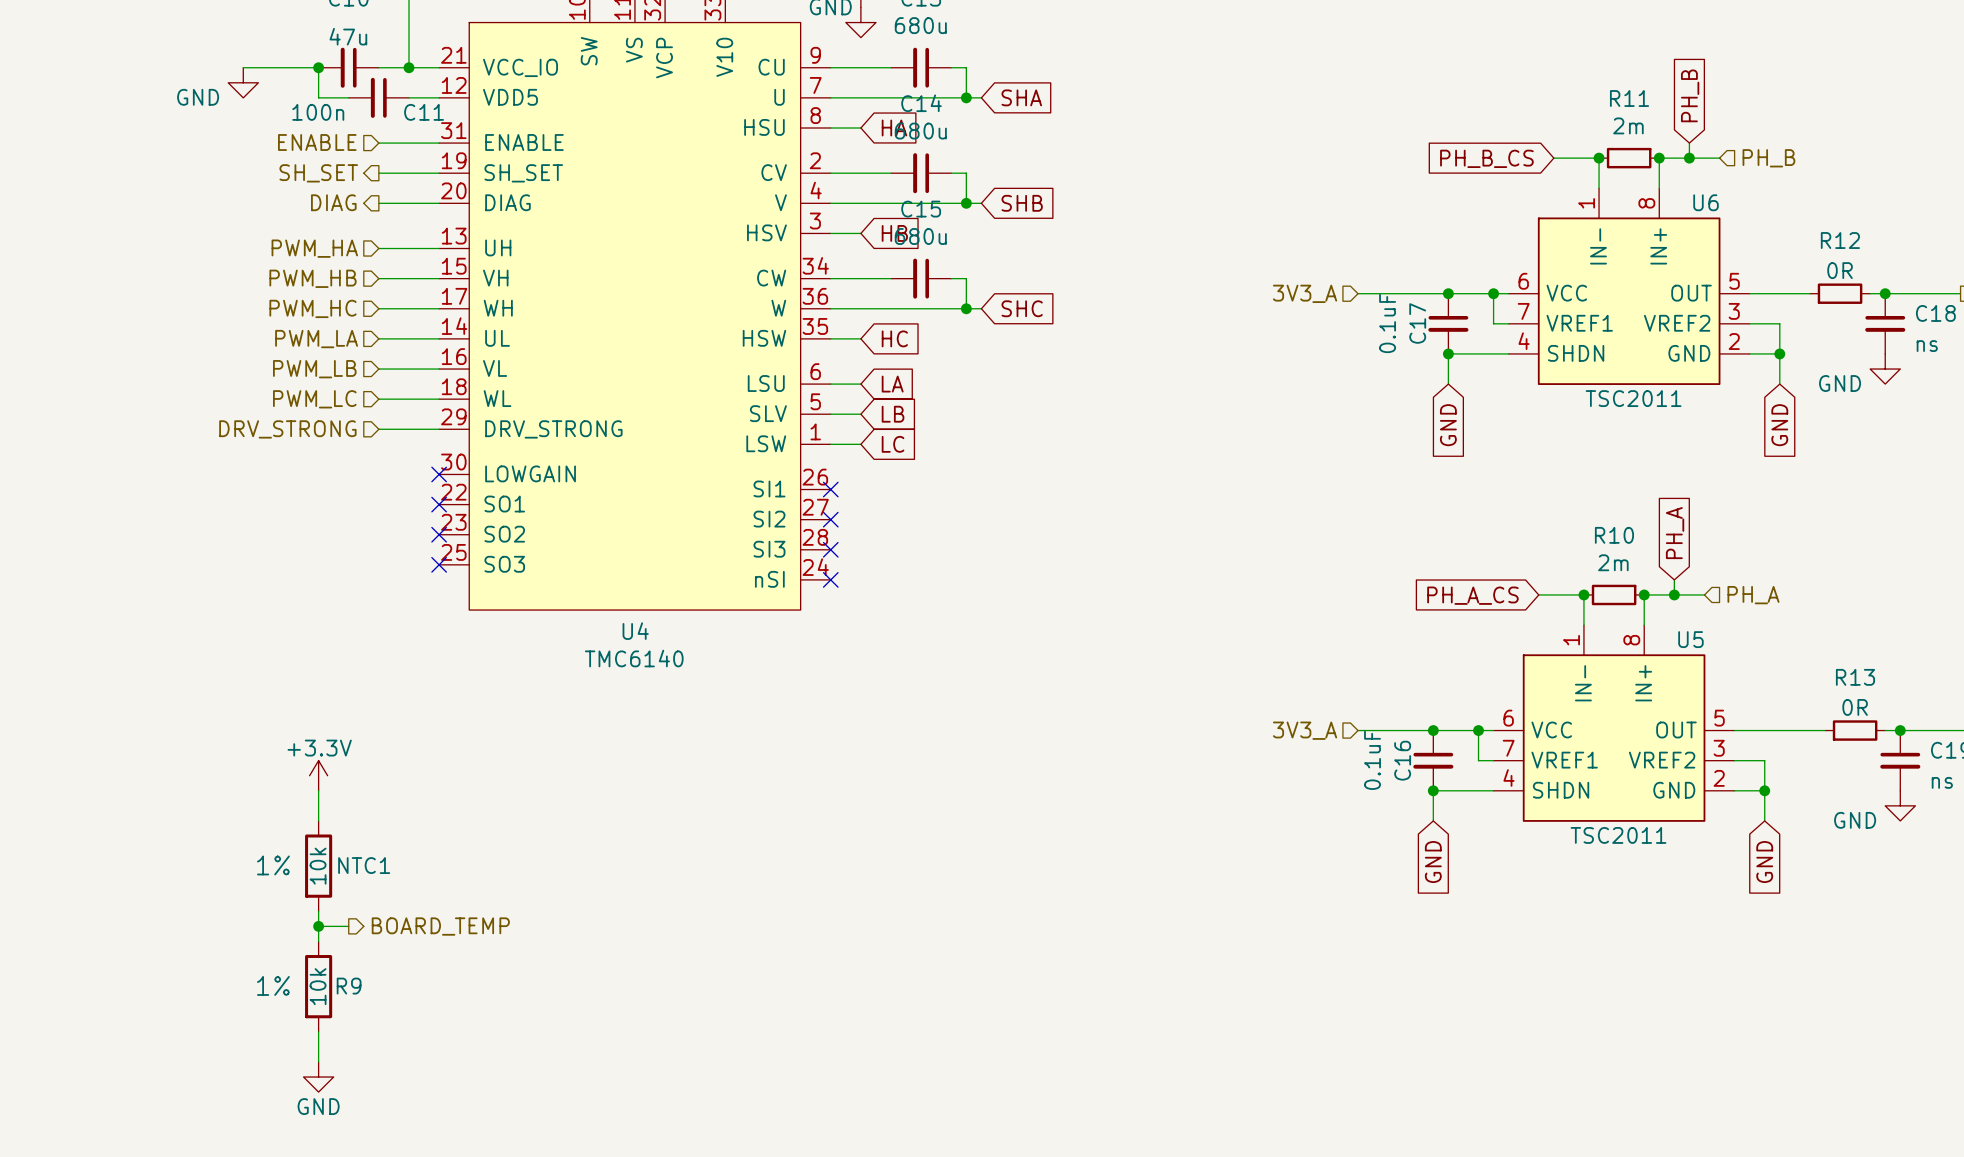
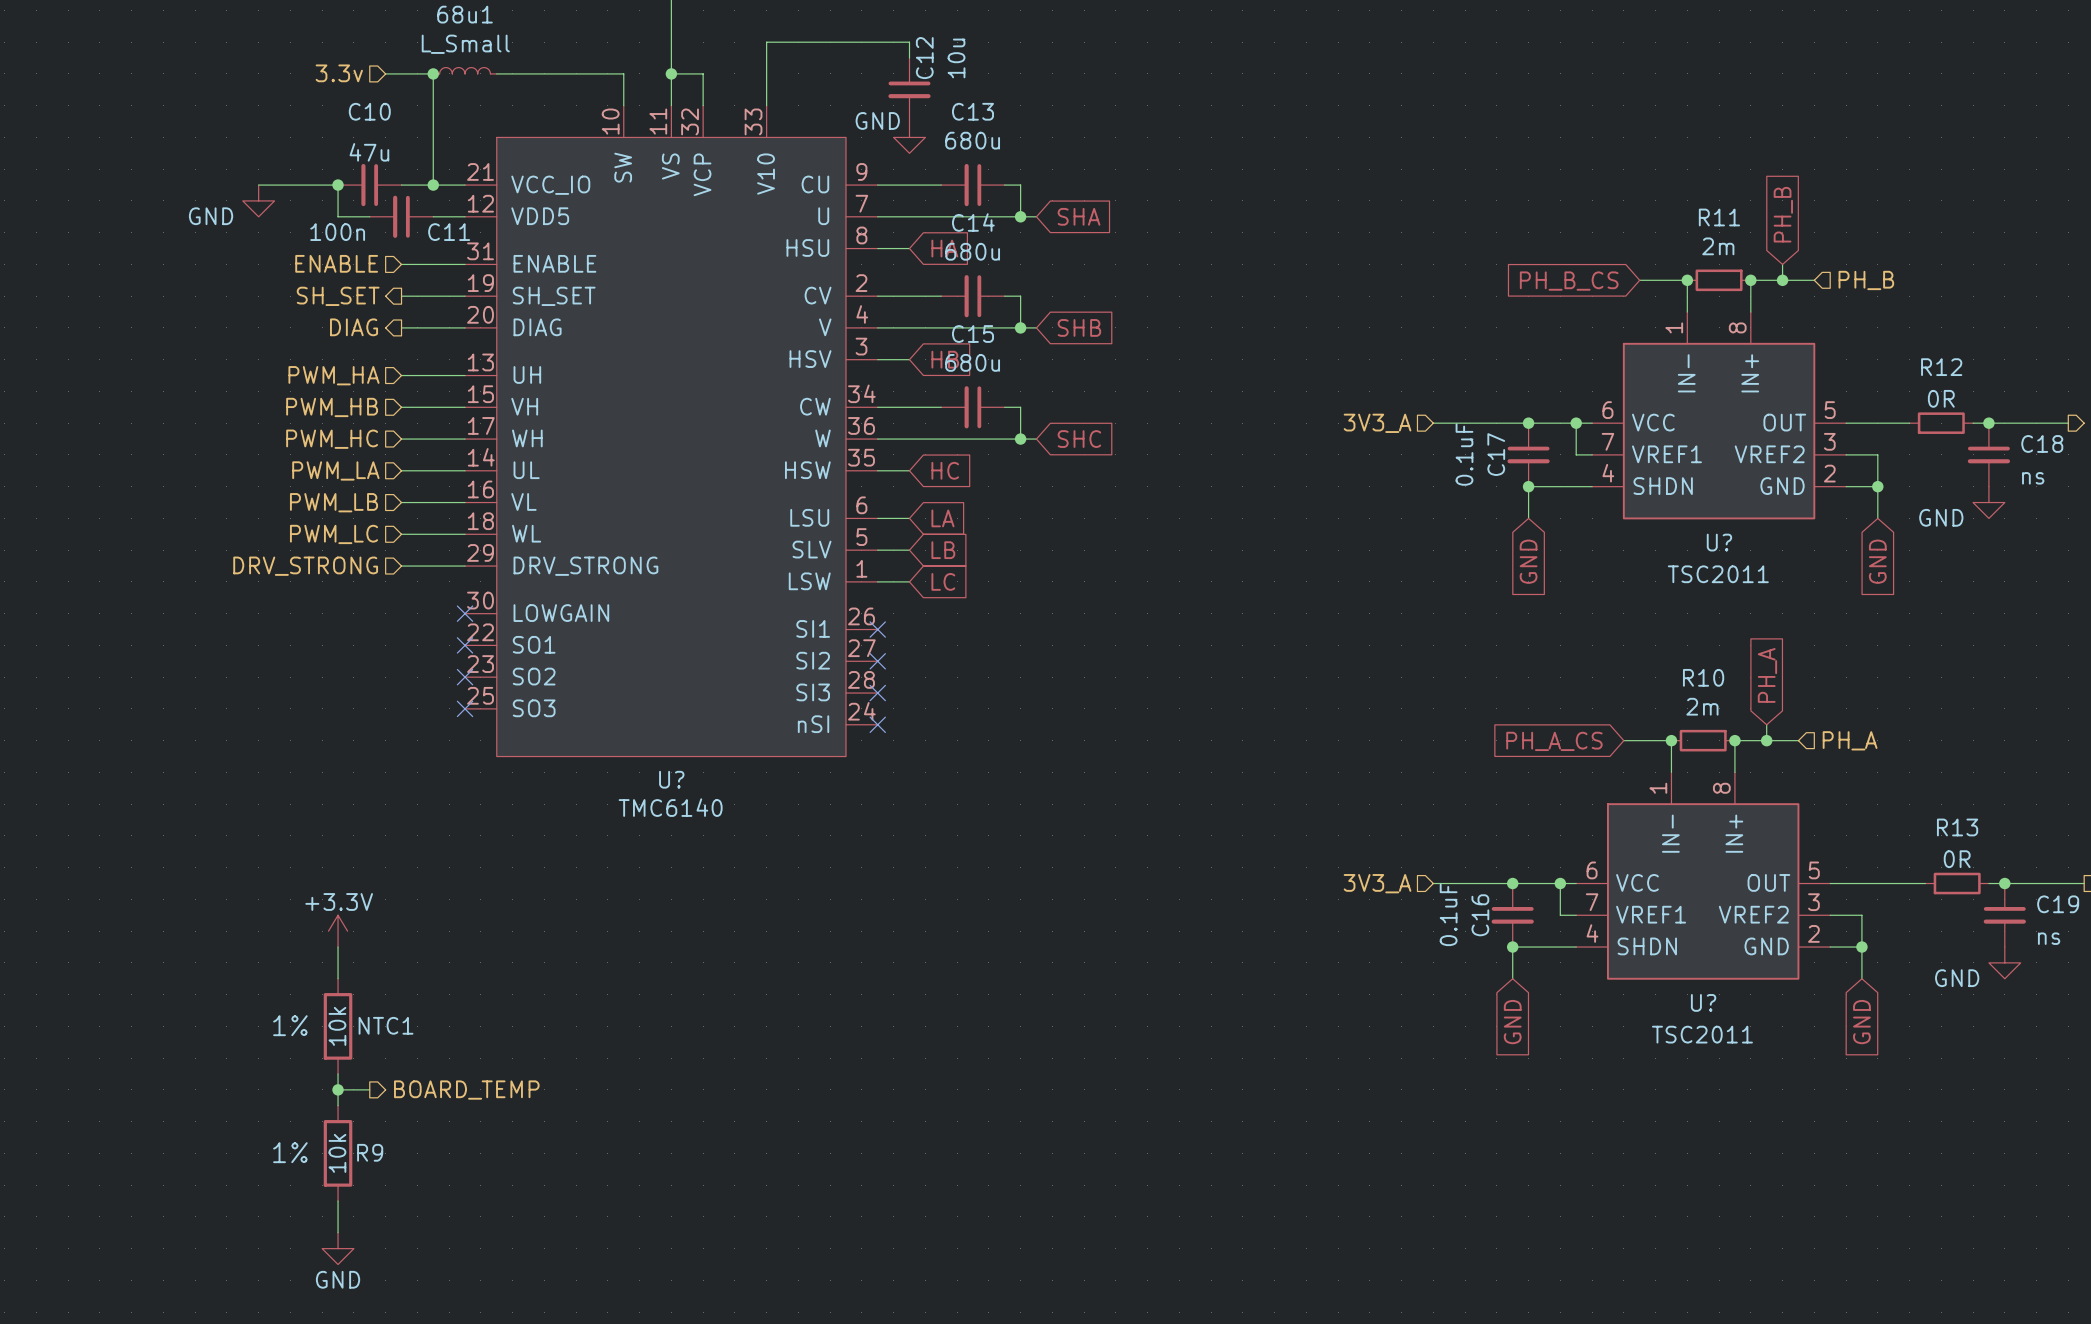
U6 name: U6 (1706, 202) -> U? (1719, 542)
U6 value position: TSC2011 (1633, 398) -> TSC2011 (1718, 574)
U4 name: U4 (635, 631) -> U? (671, 779)
U5 name: U5 (1690, 639) -> U? (1703, 1002)
U5 value position: TSC2011 (1618, 835) -> TSC2011 (1702, 1034)

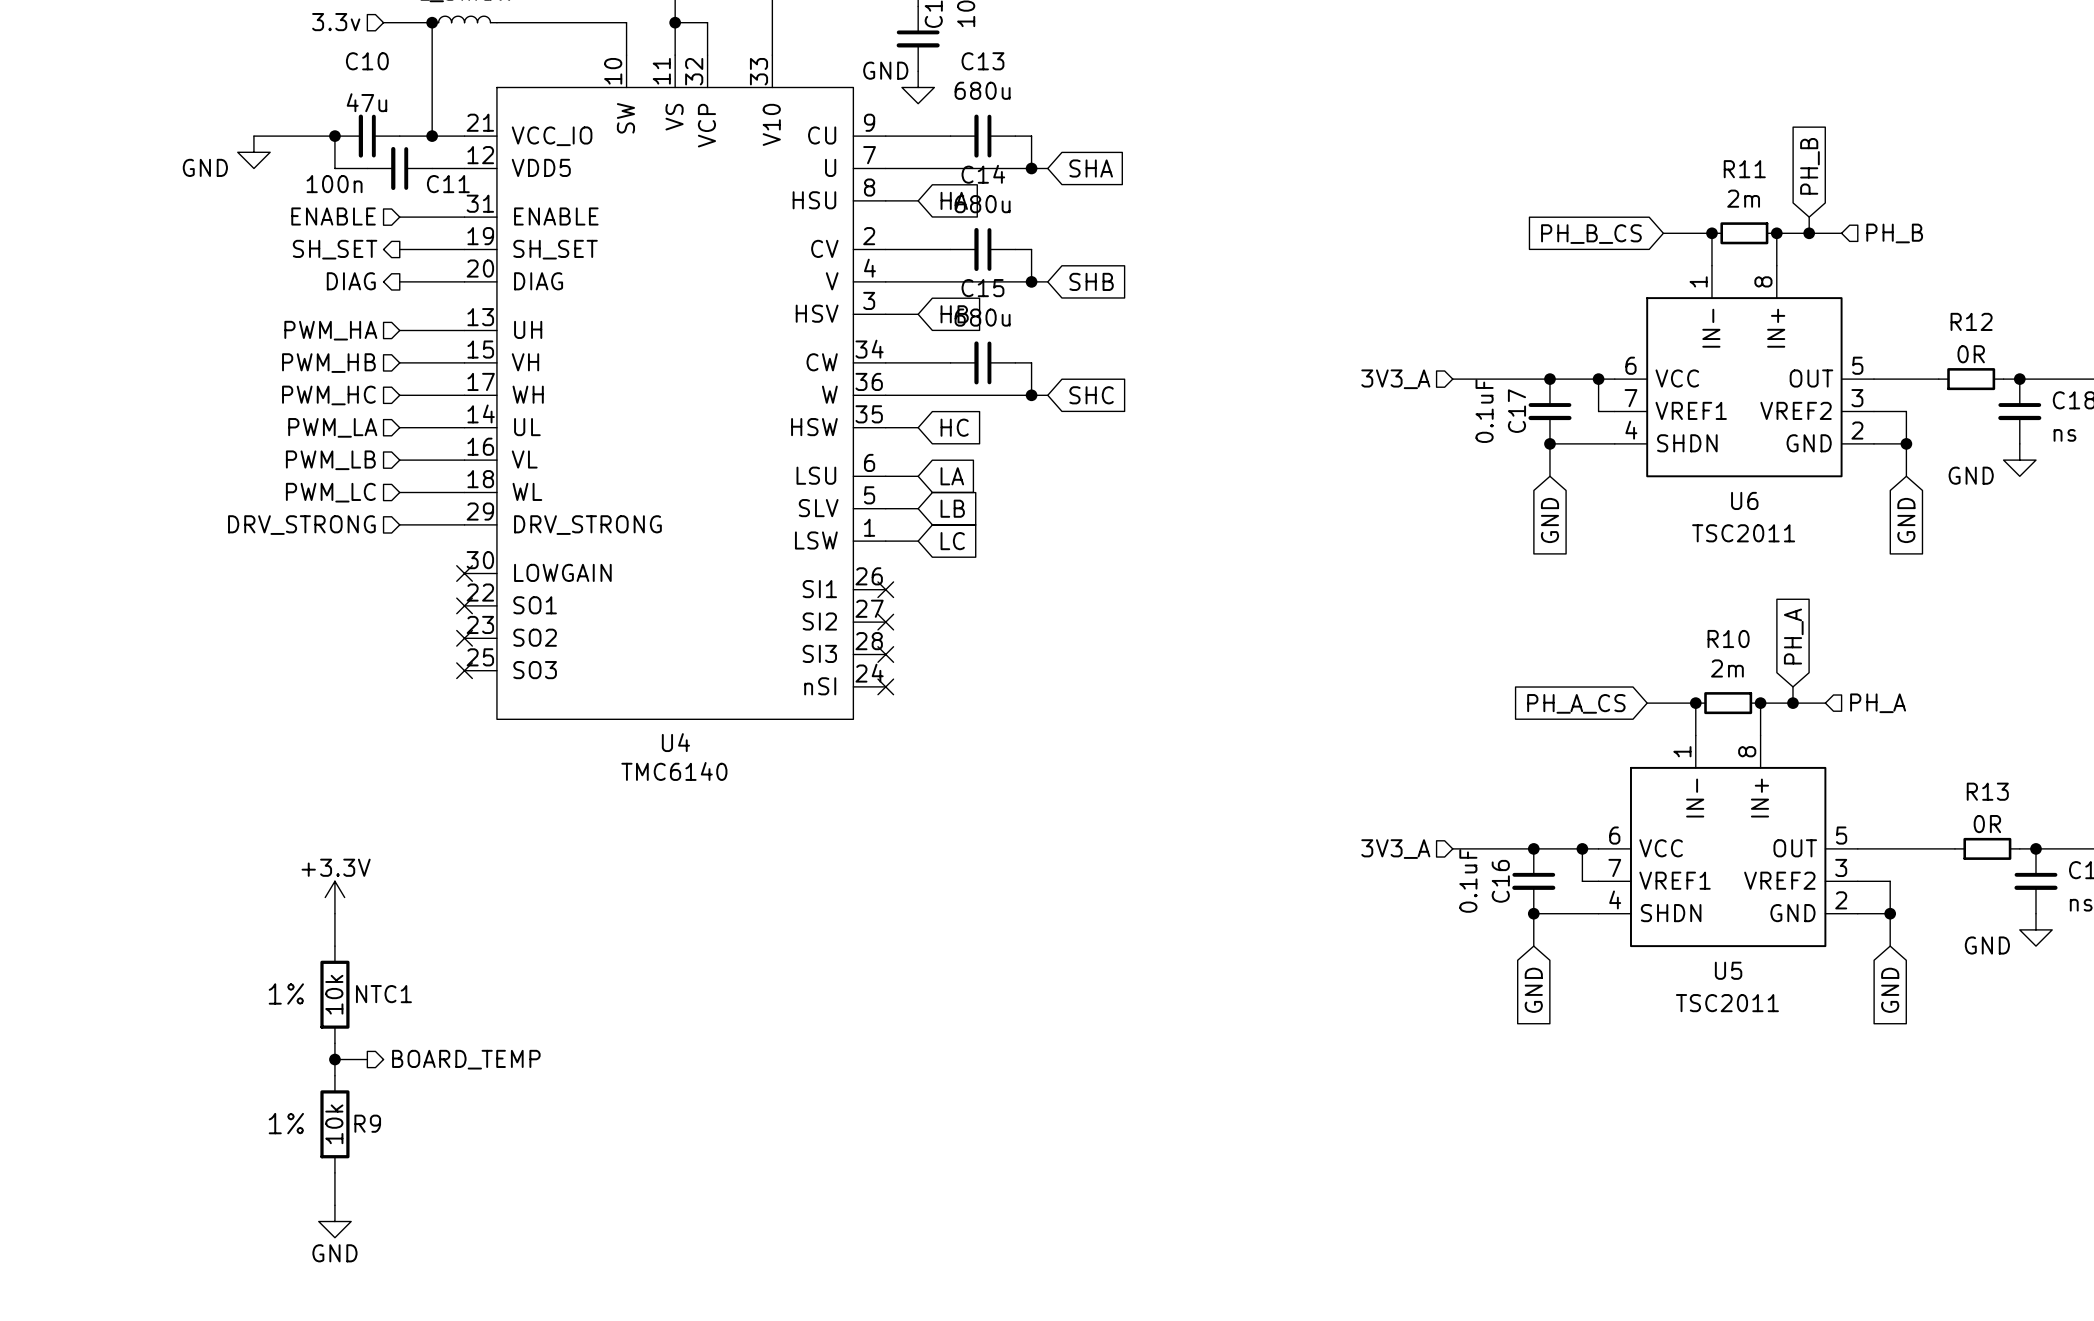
U? name: U? (1719, 542) -> U6 (1744, 500)
U? name: U? (671, 779) -> U4 (675, 742)
U? name: U? (1703, 1002) -> U5 (1728, 970)

